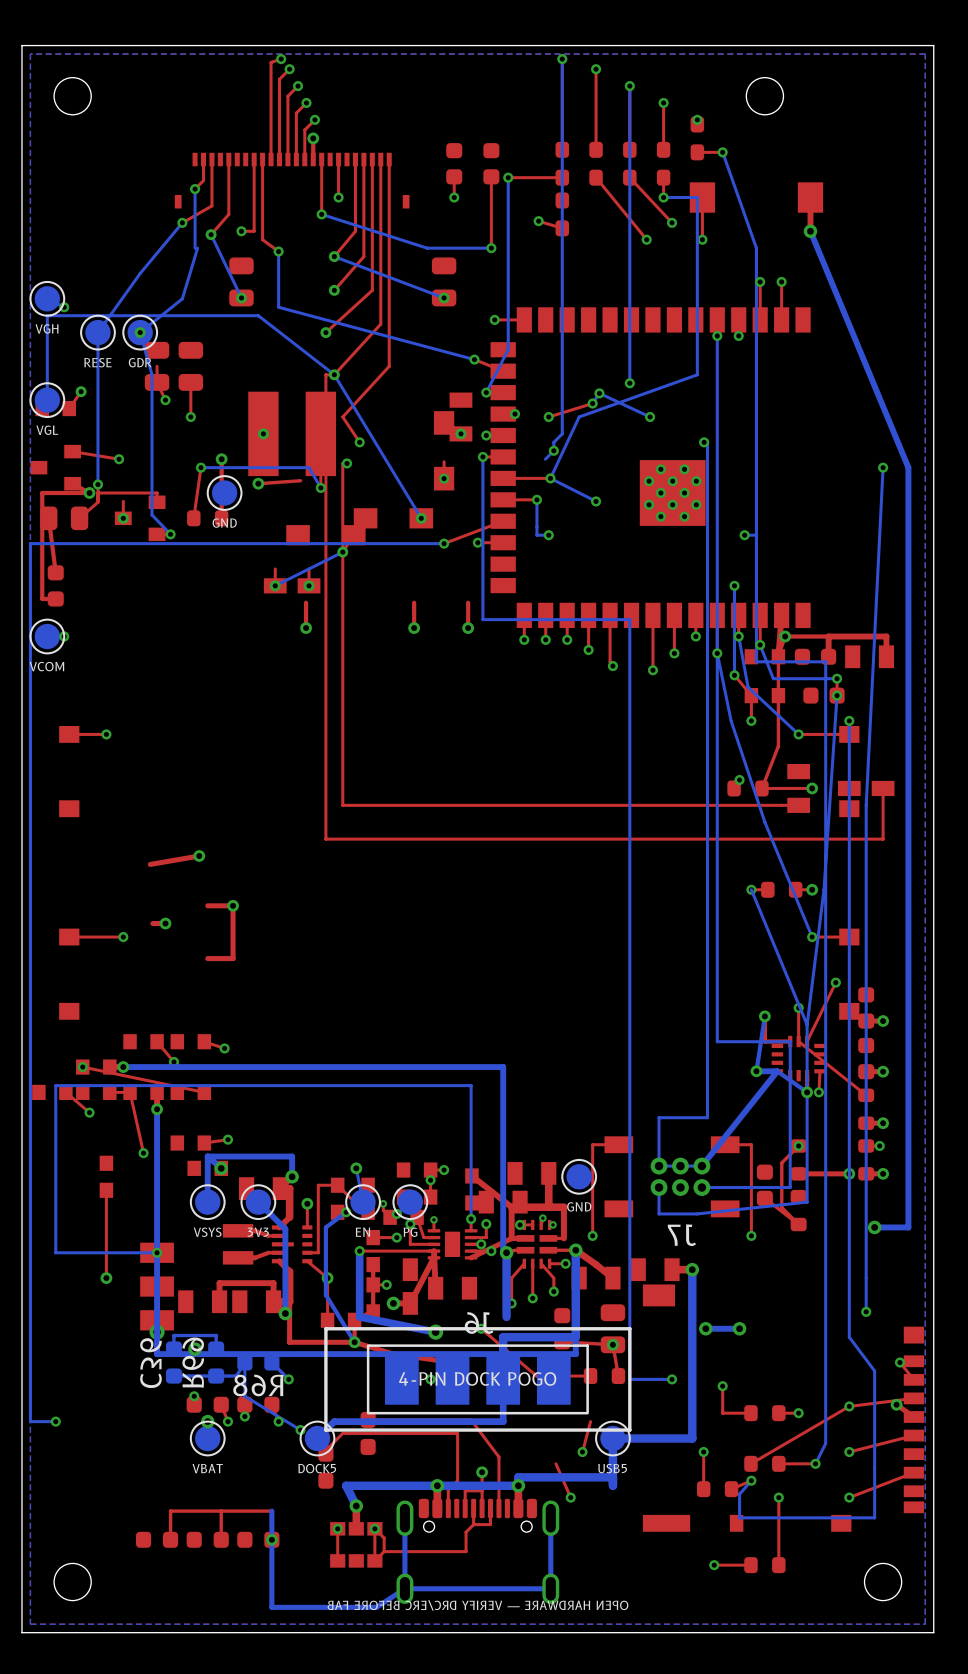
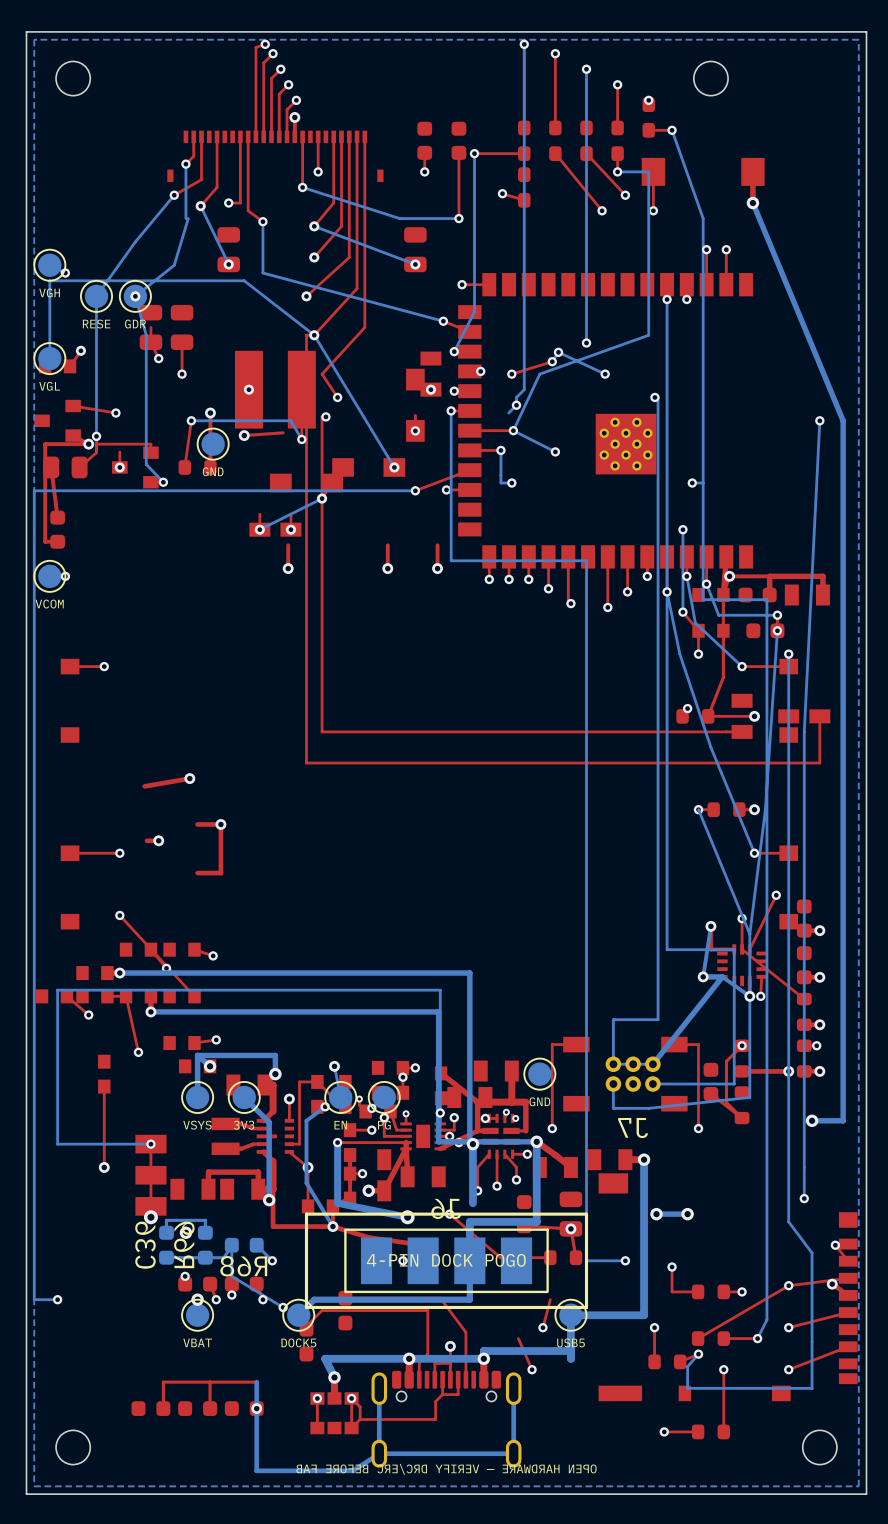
top track: (82, 1067) (204, 1092) -> (119, 915) (194, 996)
via position: (82, 1067) -> (119, 915)
bottom track: (157, 1109) (157, 1354) (575, 1354) (575, 1337) -> (150, 1011) (438, 1011) (438, 1141) (536, 1141)

